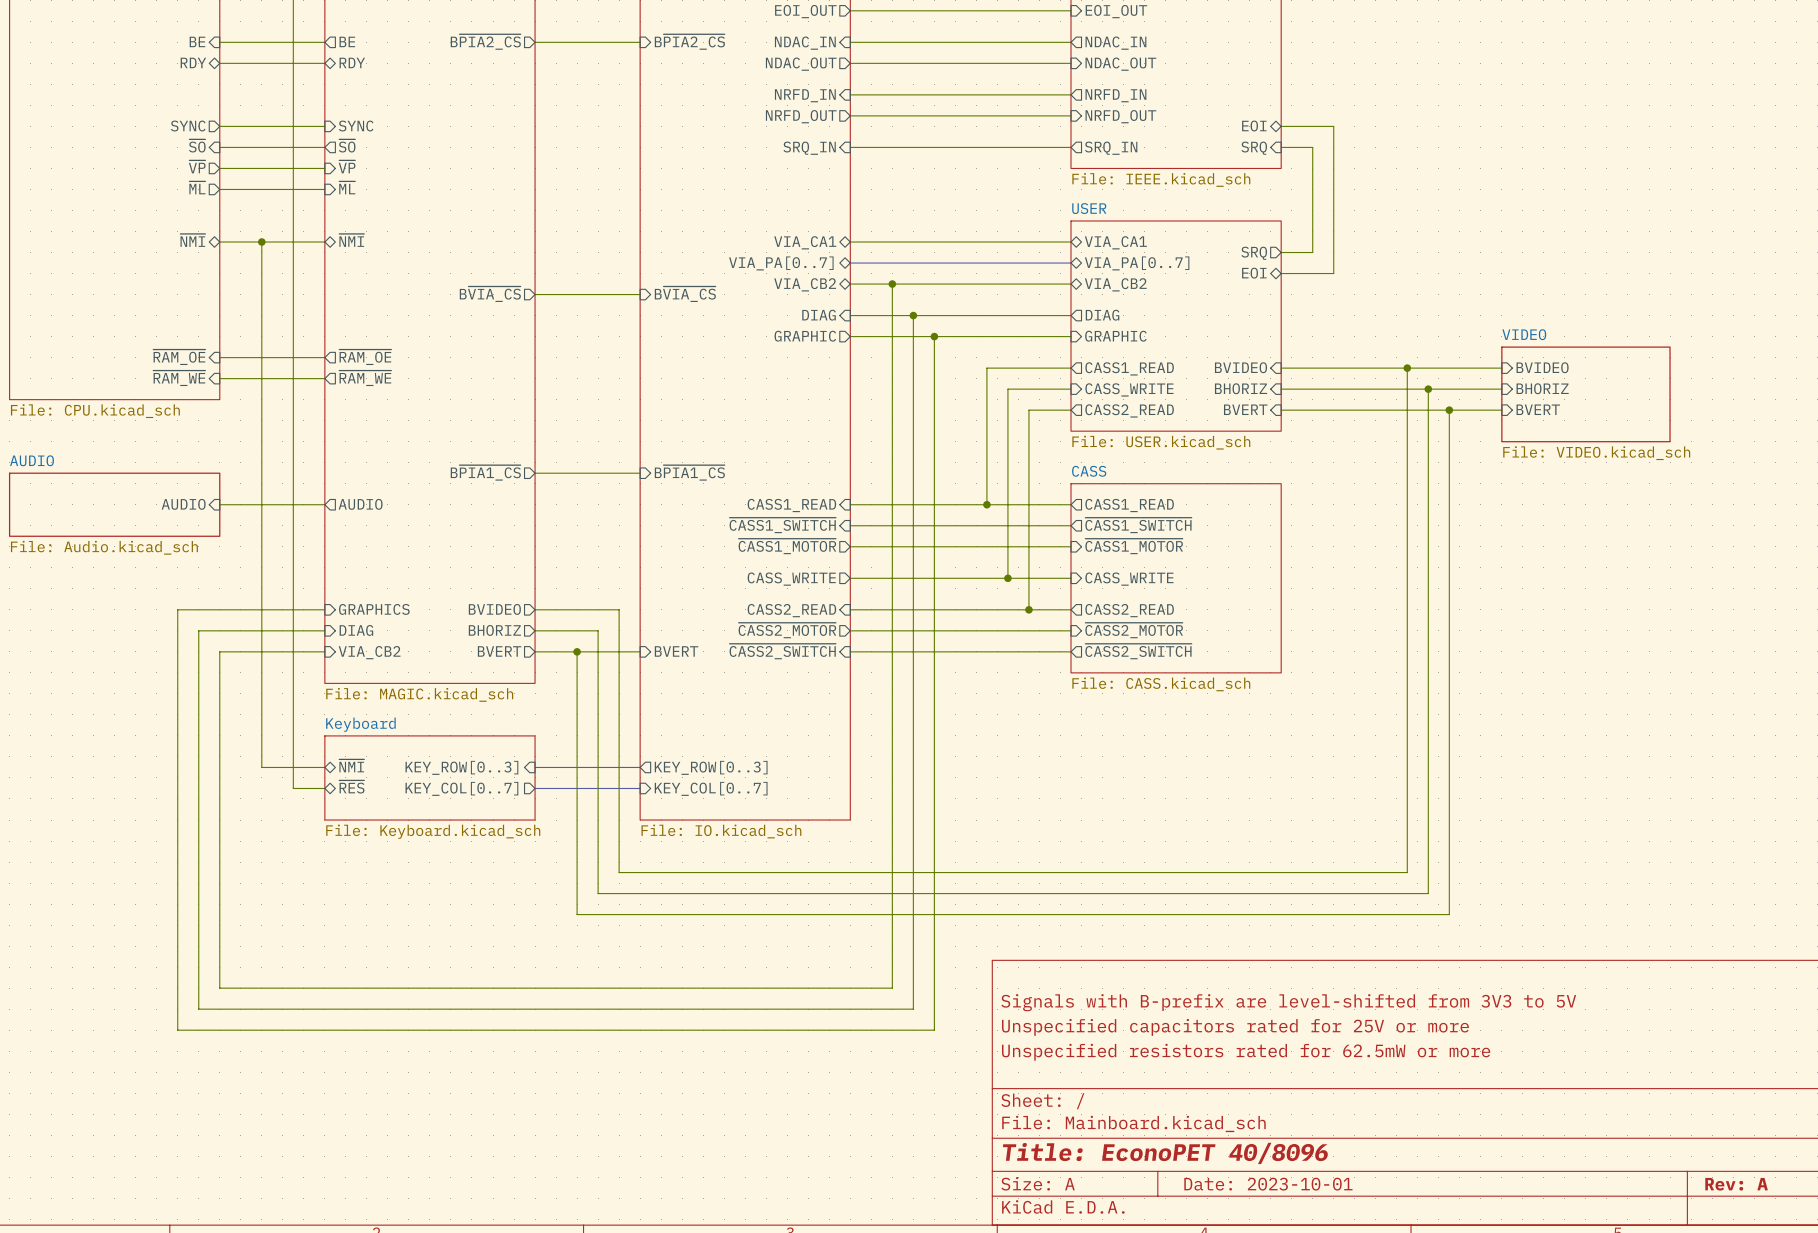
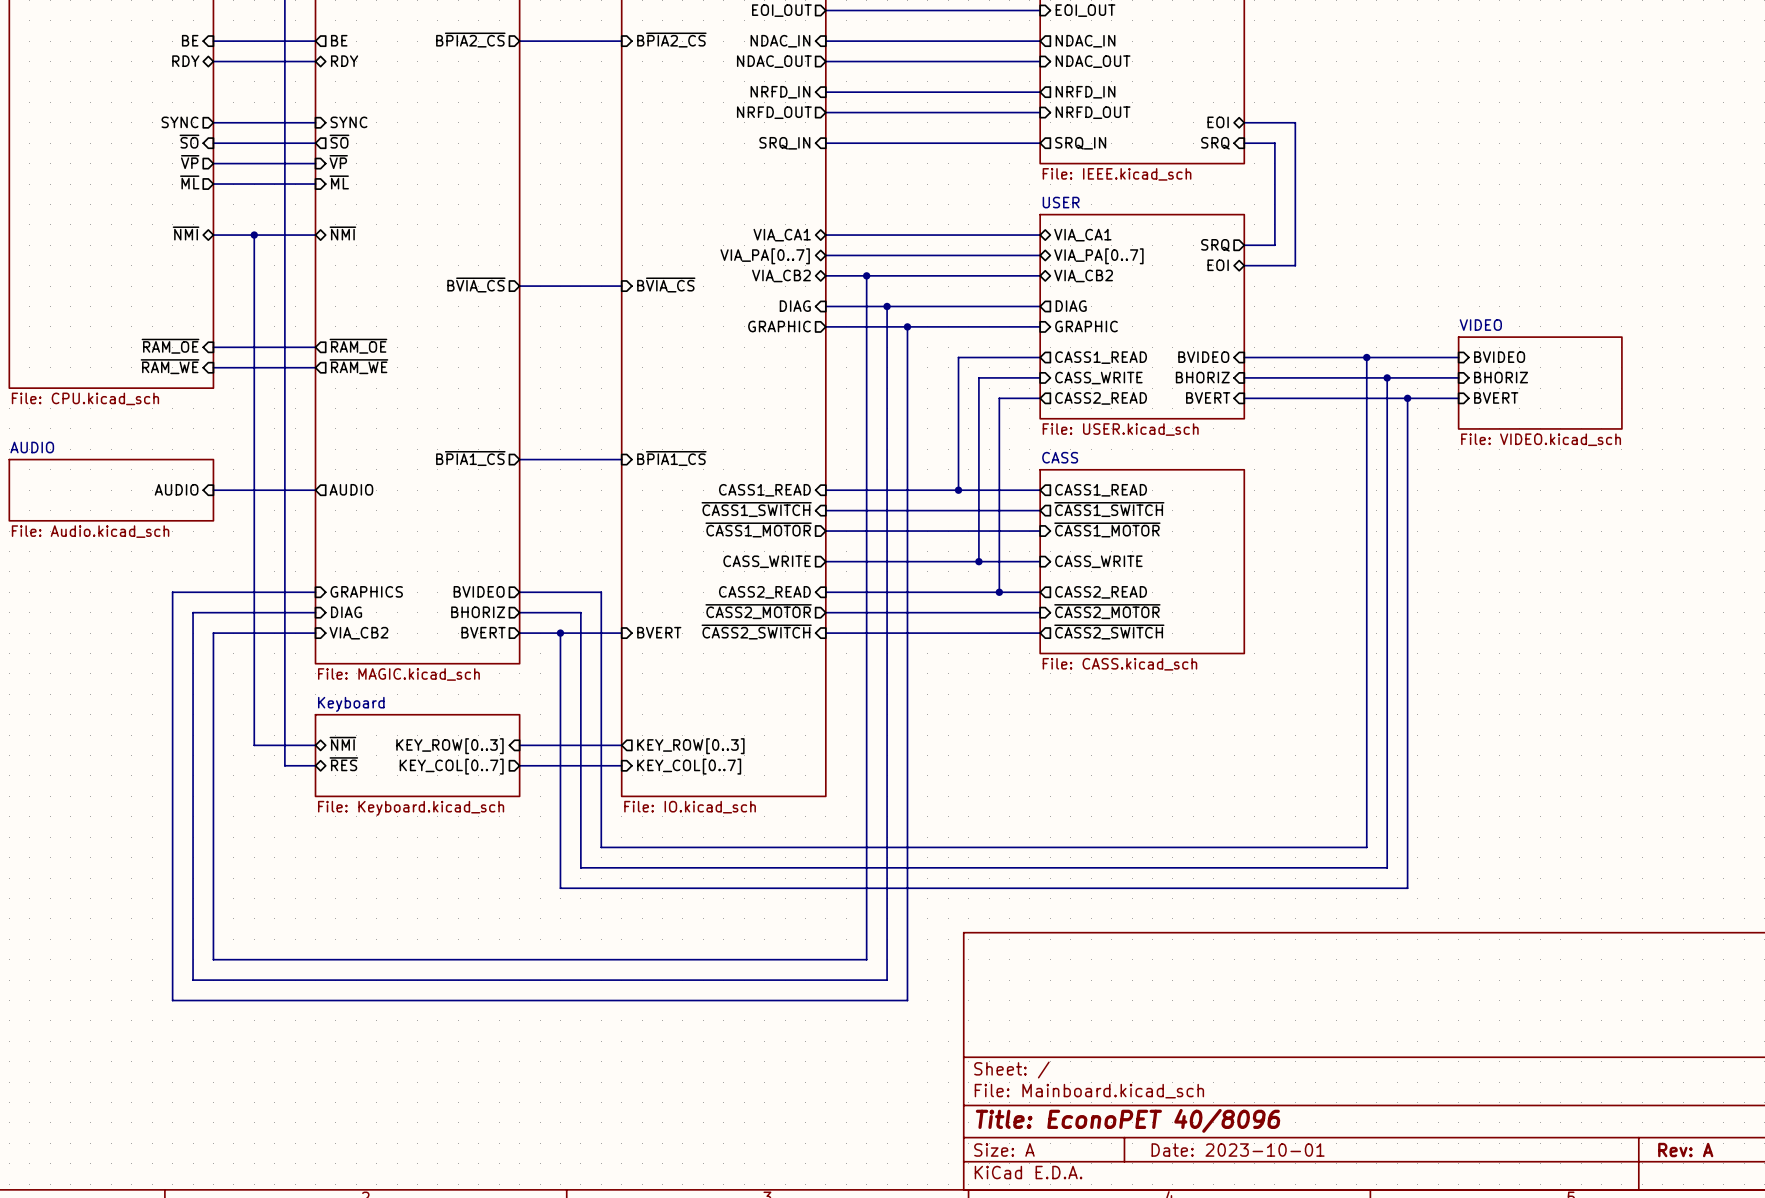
title block: Signals with B-prefix are level-shifted from 3V3 to 5V (1288, 1002) -> none
title block: Unspecified capacitors rated for 25V or more (1235, 1027) -> none
title block: Unspecified resistors rated for 62.5mW or more (1246, 1052) -> none

